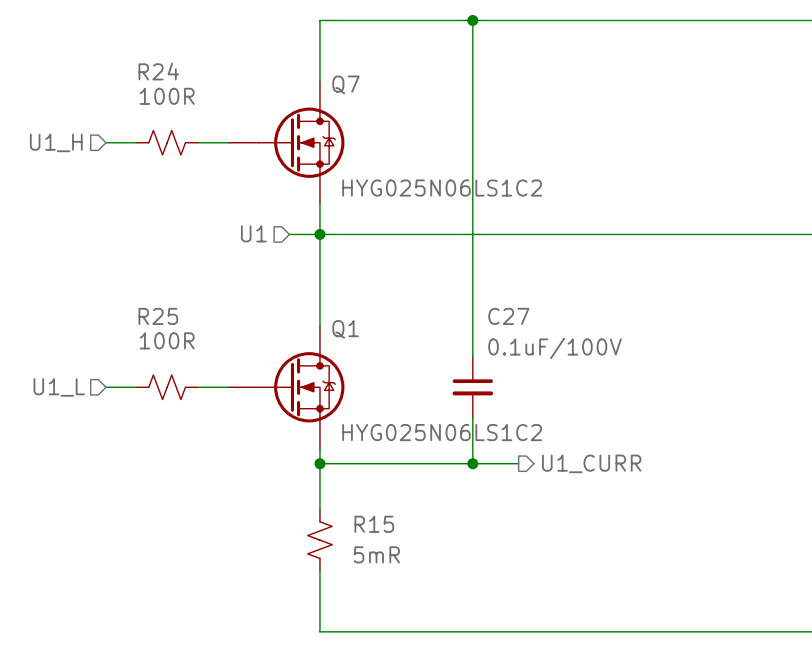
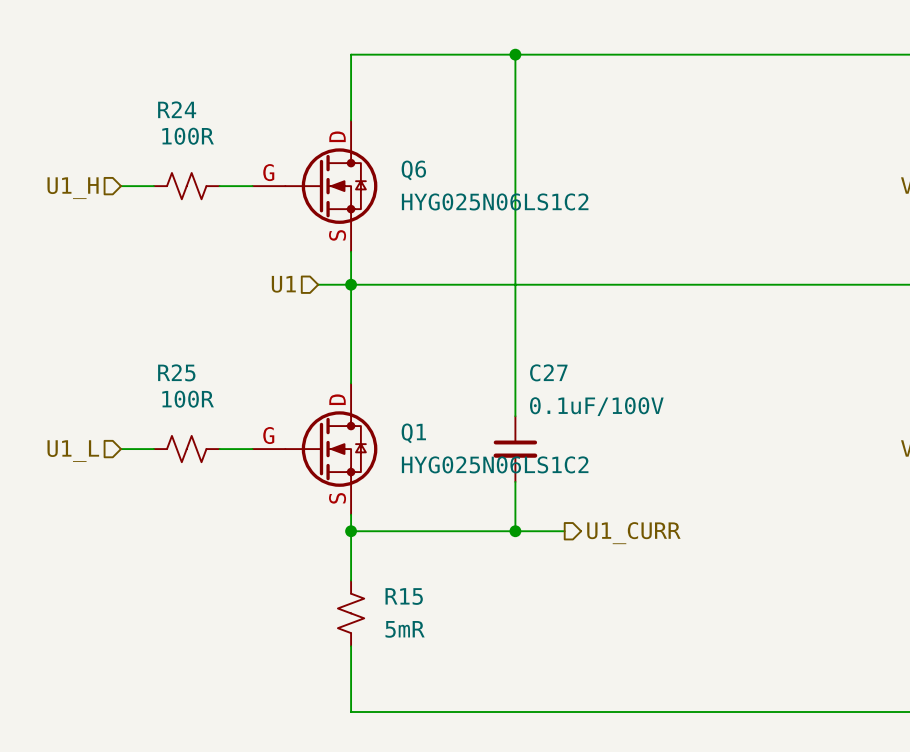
Q7: HYG025N06LS1C2 (286, 142) -> none
Q6: none -> HYG025N06LS1C2 (314, 186)
Q1 symbol: [228, 326, 345, 449] -> [252, 383, 378, 515]
Q1 name position: Q1 (345, 329) -> Q1 (413, 433)
Q1 value position: HYG025N06LS1C2 (442, 432) -> HYG025N06LS1C2 (495, 464)

